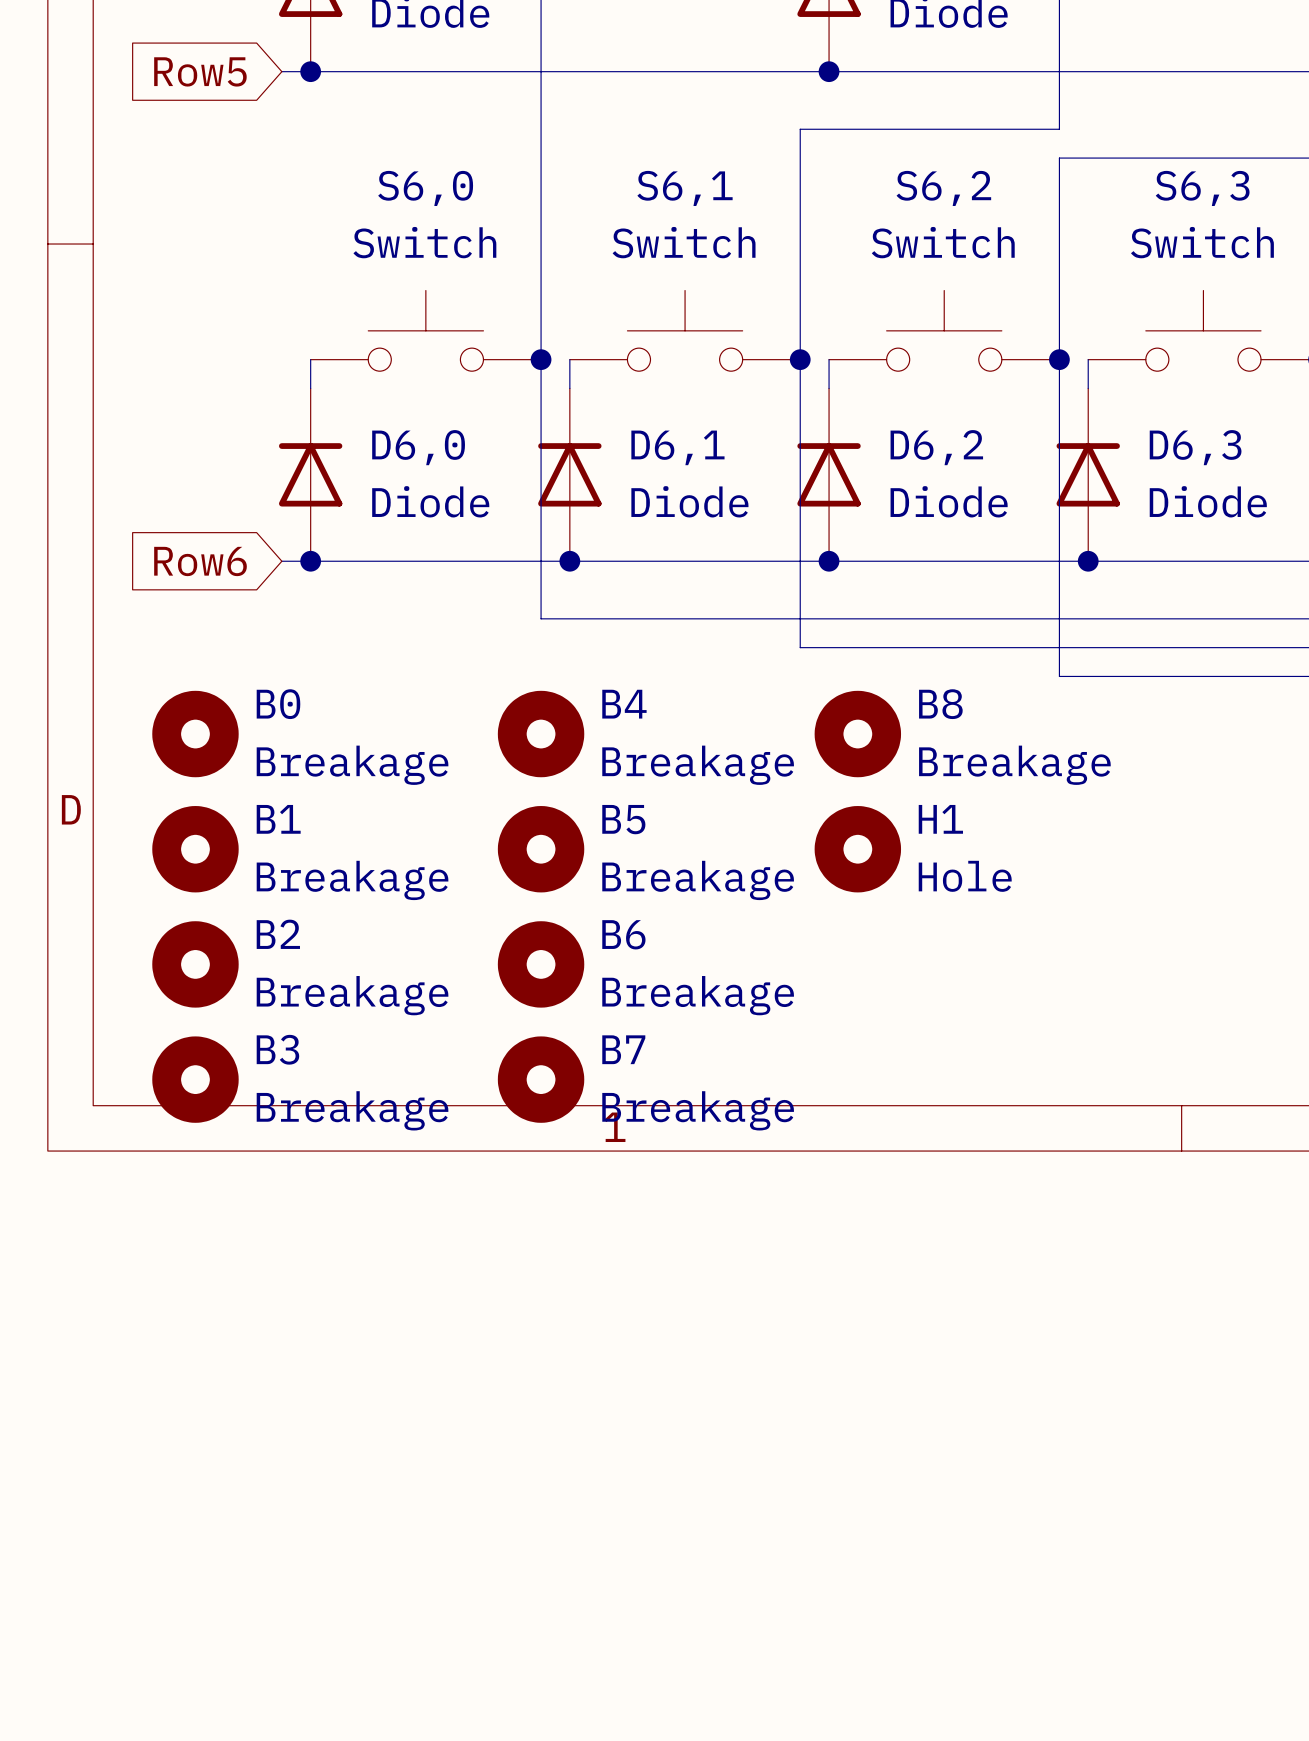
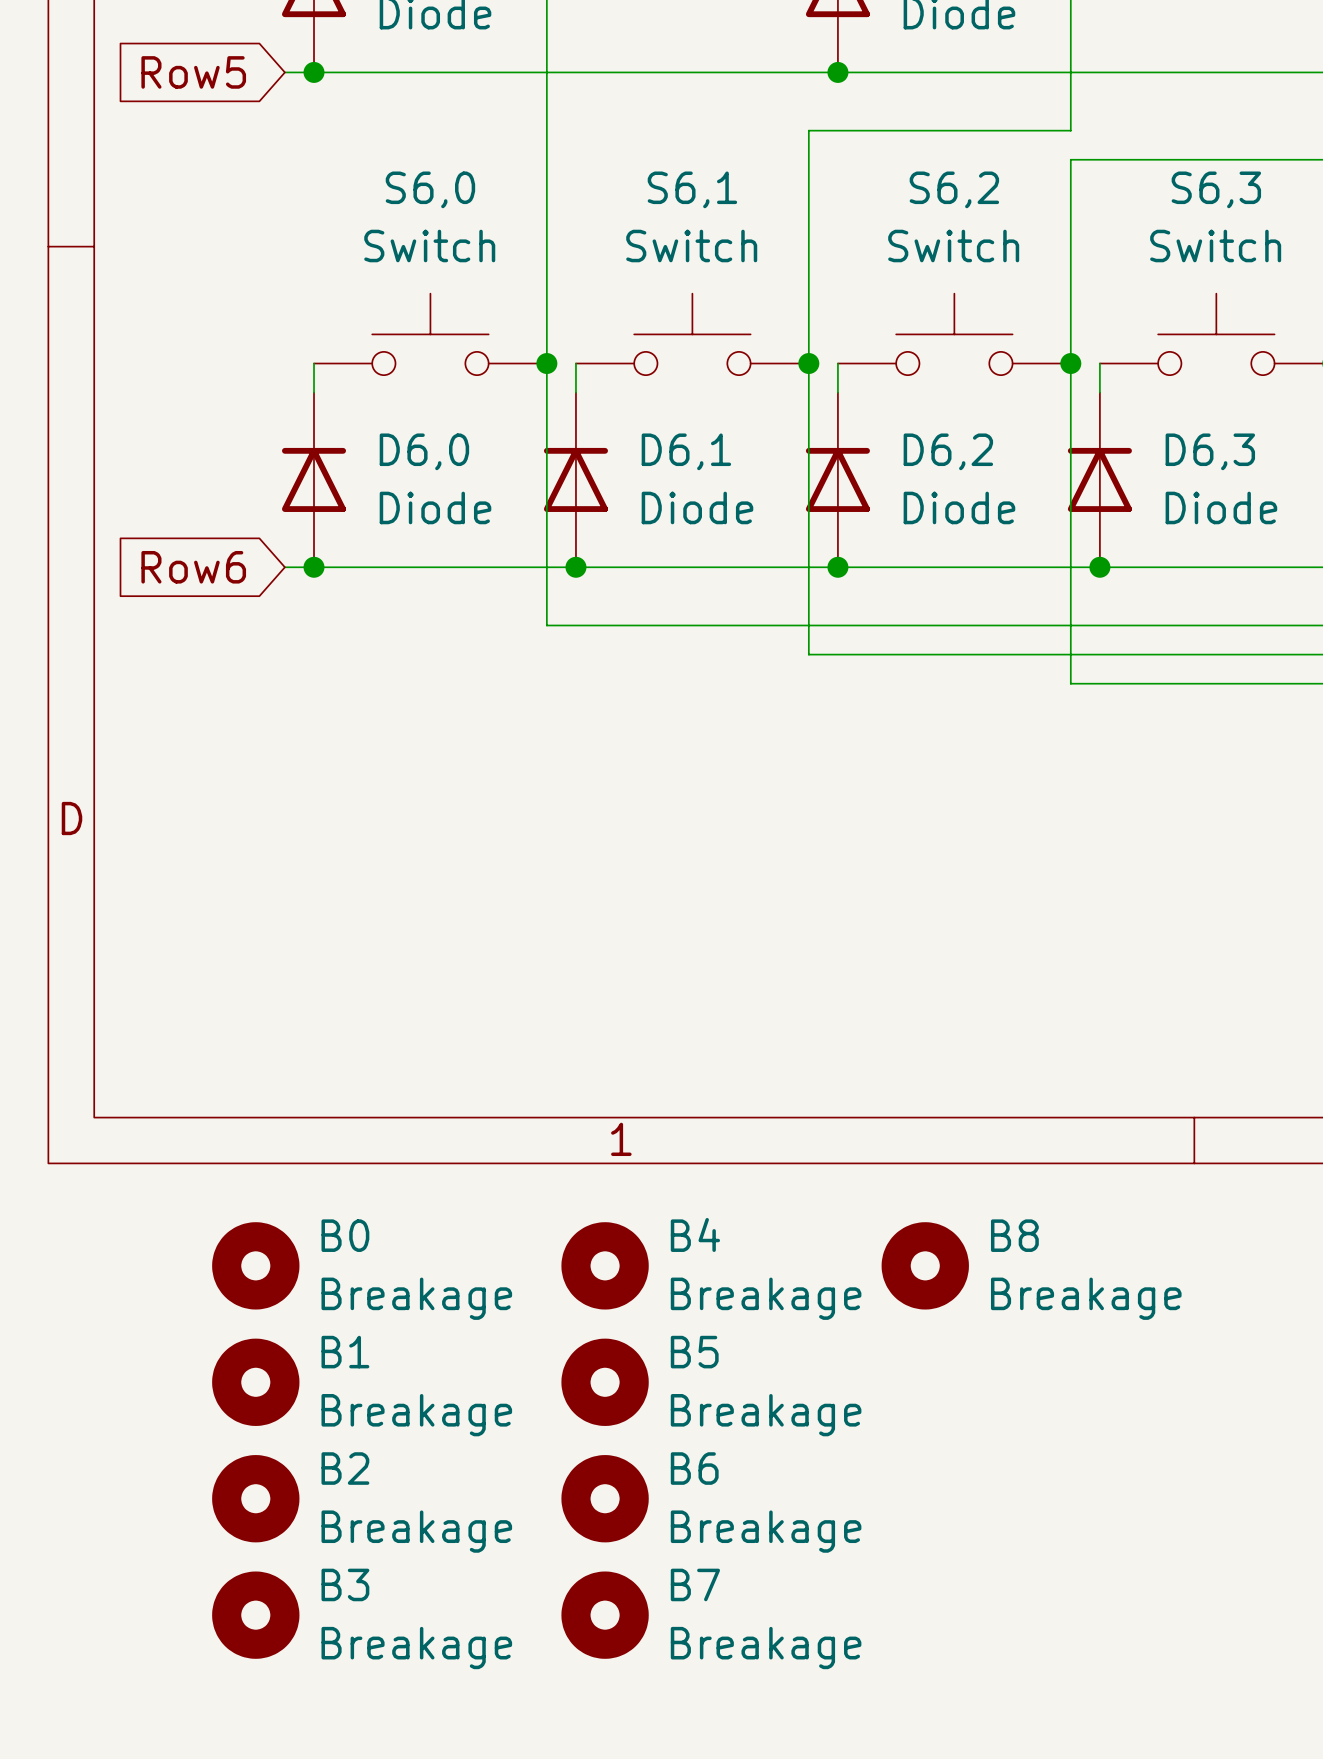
B0 position: (195, 734) -> (255, 1265)
B4 position: (541, 734) -> (605, 1265)
B8 position: (857, 734) -> (925, 1265)
B1 position: (195, 849) -> (255, 1382)
B5 position: (541, 849) -> (605, 1382)
H1: Hole (857, 849) -> none
B2 position: (195, 964) -> (255, 1498)
B6 position: (541, 964) -> (605, 1498)
B3 position: (195, 1079) -> (255, 1615)
B7 position: (541, 1079) -> (605, 1615)

